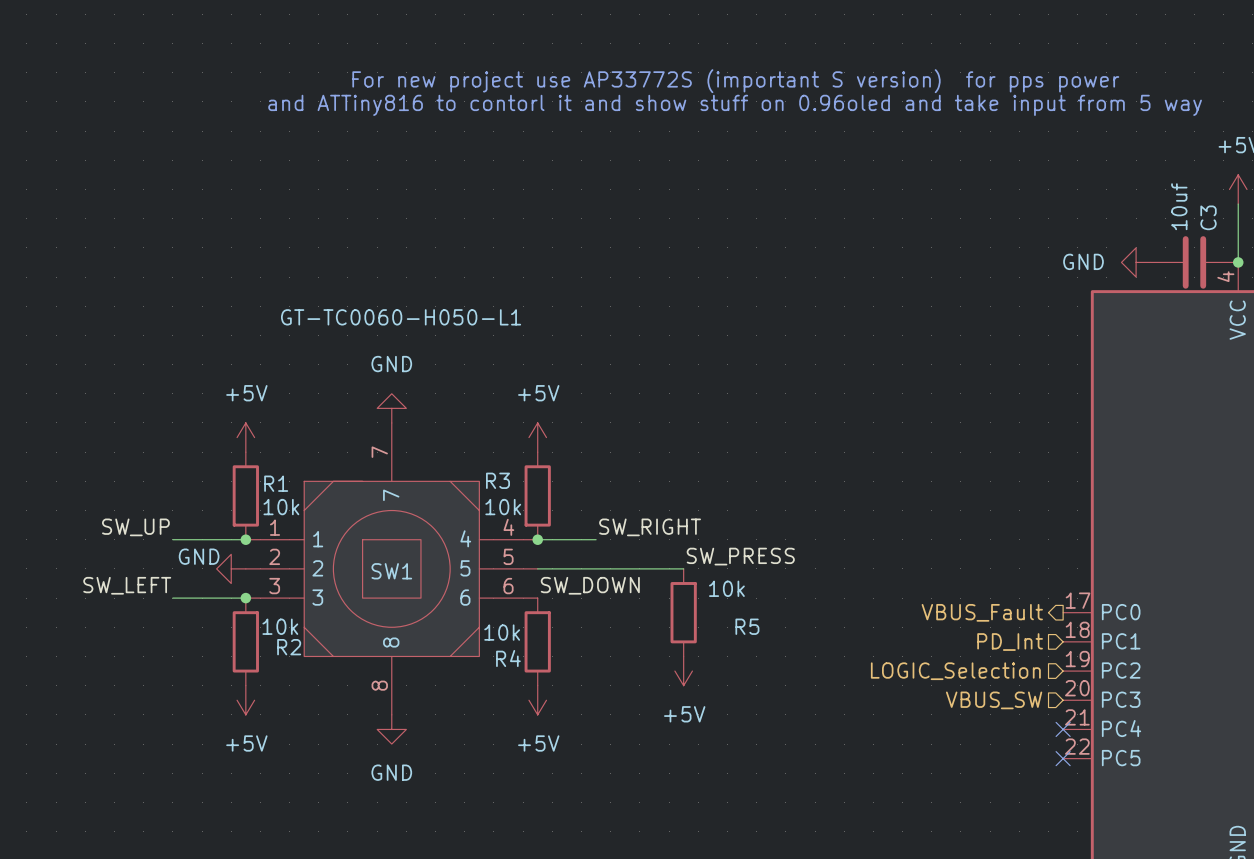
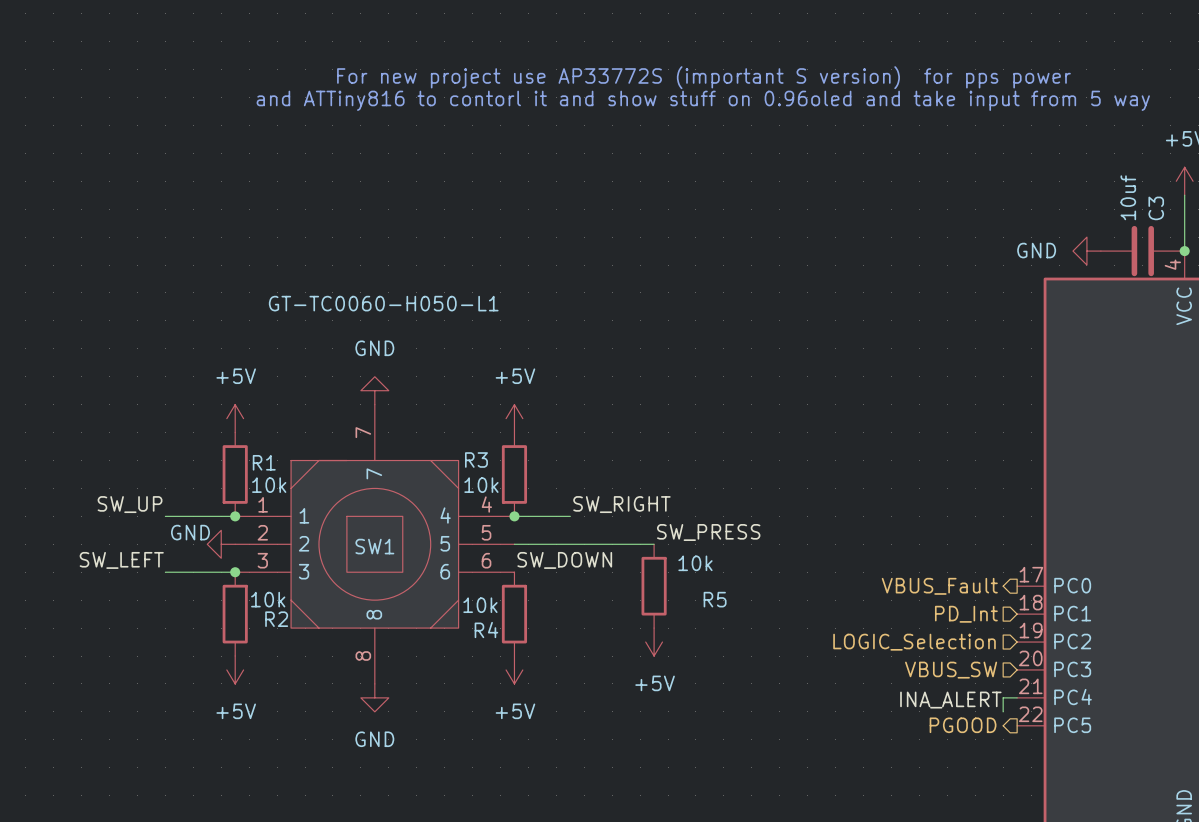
wire: none -> (1017, 697) (1003, 697) (1003, 711)
no-connect mark: (1063, 729) -> none
label: none -> INA_ALERT (950, 700)
hierarchical label: none -> PGOOD (963, 725)
no-connect mark: (1063, 758) -> none

